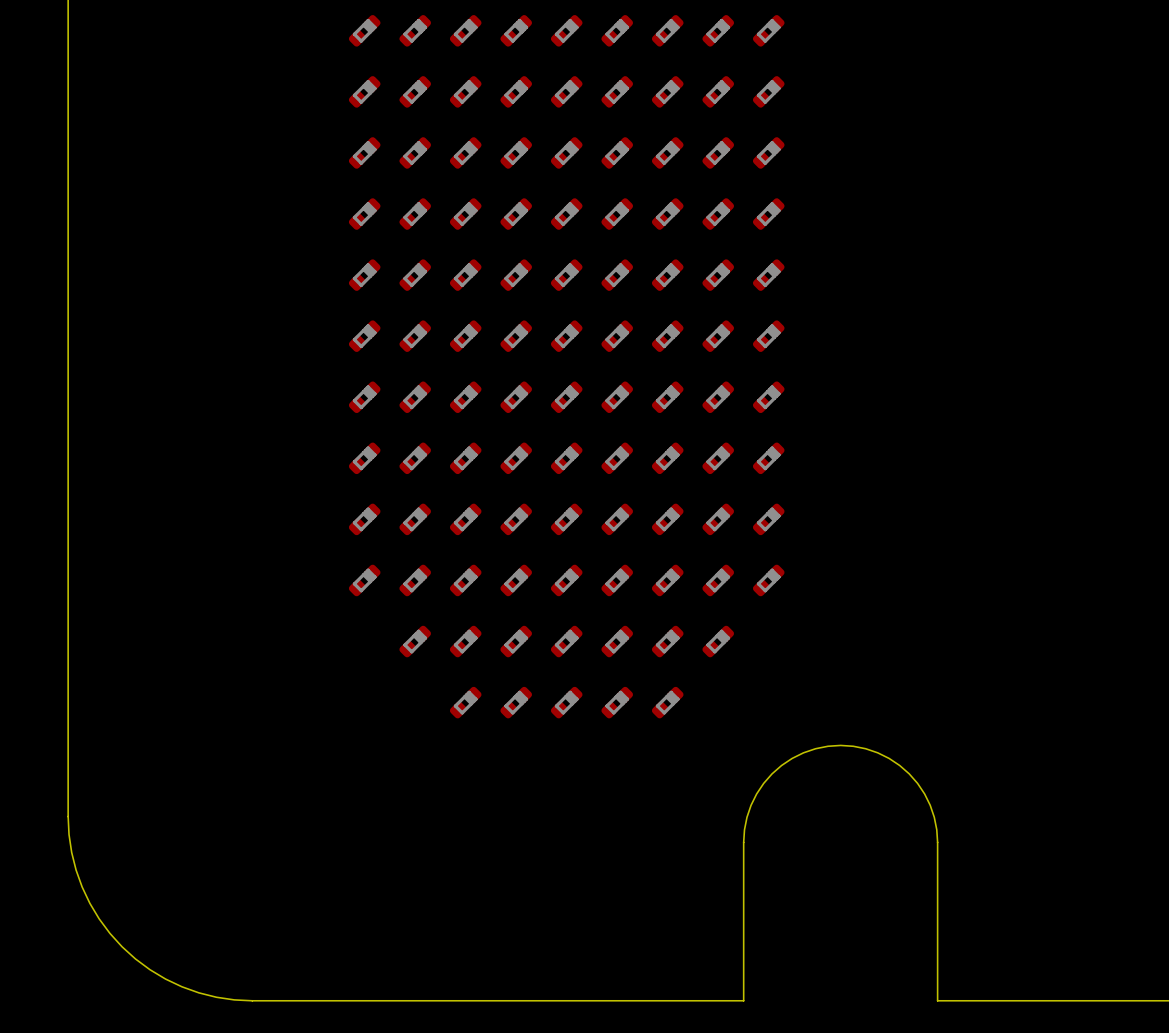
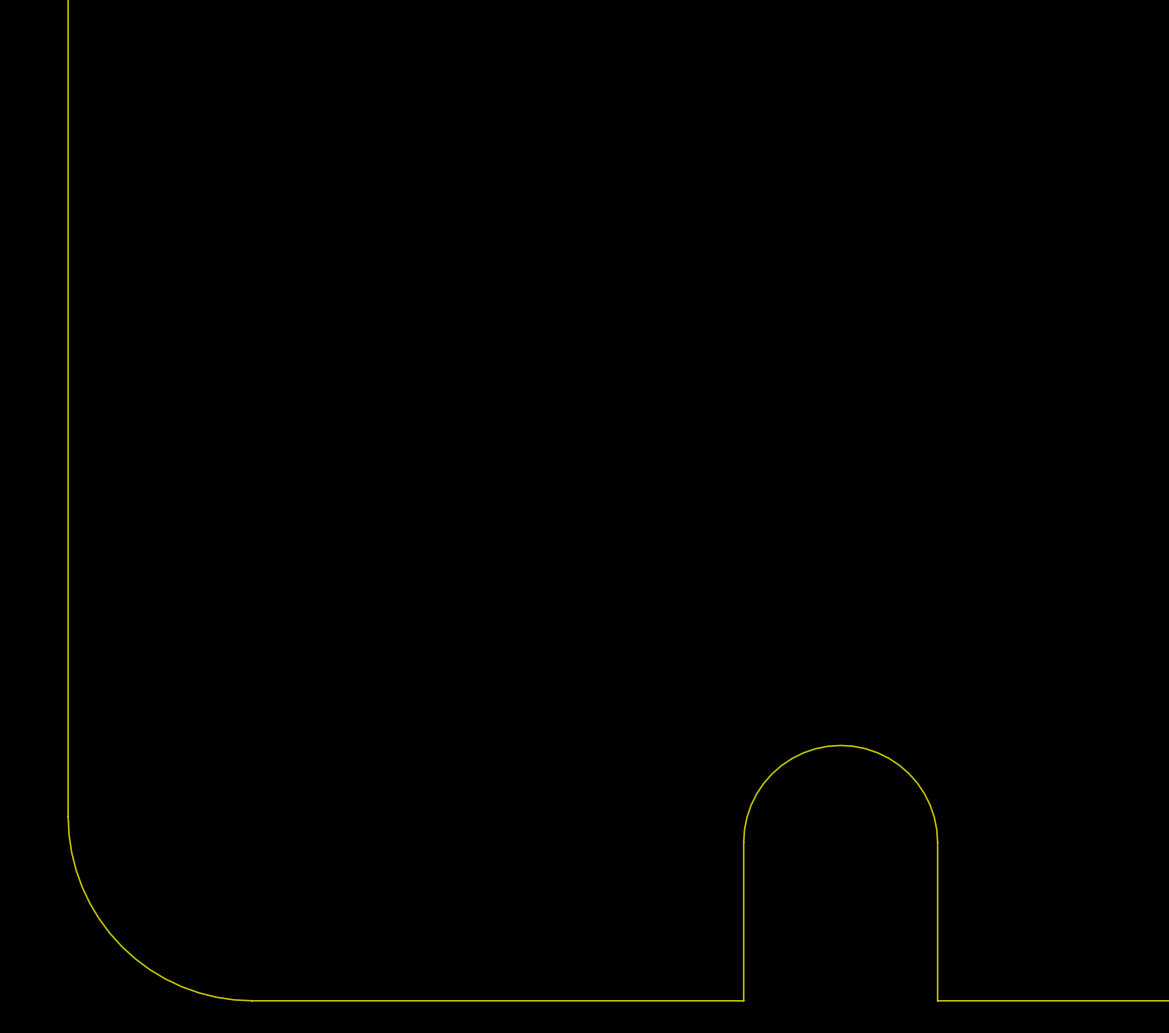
part: (364, 30) -> none
part: (415, 30) -> none
part: (465, 30) -> none
part: (516, 30) -> none
part: (566, 30) -> none
part: (617, 30) -> none
part: (667, 30) -> none
part: (718, 30) -> none
part: (768, 30) -> none
part: (364, 91) -> none
part: (415, 91) -> none
part: (465, 91) -> none
part: (516, 91) -> none
part: (566, 91) -> none
part: (617, 91) -> none
part: (667, 91) -> none
part: (718, 91) -> none
part: (768, 91) -> none
part: (364, 152) -> none
part: (415, 152) -> none
part: (465, 152) -> none
part: (516, 152) -> none
part: (566, 152) -> none
part: (617, 152) -> none
part: (667, 152) -> none
part: (718, 152) -> none
part: (768, 152) -> none
part: (364, 214) -> none
part: (415, 214) -> none
part: (465, 214) -> none
part: (516, 214) -> none
part: (566, 214) -> none
part: (617, 214) -> none
part: (667, 214) -> none
part: (718, 214) -> none
part: (768, 214) -> none
part: (364, 275) -> none
part: (415, 275) -> none
part: (465, 275) -> none
part: (516, 275) -> none
part: (566, 275) -> none
part: (617, 275) -> none
part: (667, 275) -> none
part: (718, 275) -> none
part: (768, 275) -> none
part: (364, 336) -> none
part: (415, 336) -> none
part: (465, 336) -> none
part: (516, 336) -> none
part: (566, 336) -> none
part: (617, 336) -> none
part: (667, 336) -> none
part: (718, 336) -> none
part: (768, 336) -> none
part: (364, 397) -> none
part: (415, 397) -> none
part: (465, 397) -> none
part: (516, 397) -> none
part: (566, 397) -> none
part: (617, 397) -> none
part: (667, 397) -> none
part: (718, 397) -> none
part: (768, 397) -> none
part: (364, 458) -> none
part: (415, 458) -> none
part: (465, 458) -> none
part: (516, 458) -> none
part: (566, 458) -> none
part: (617, 458) -> none
part: (667, 458) -> none
part: (718, 458) -> none
part: (768, 458) -> none
part: (364, 519) -> none
part: (415, 519) -> none
part: (465, 519) -> none
part: (516, 519) -> none
part: (566, 519) -> none
part: (617, 519) -> none
part: (667, 519) -> none
part: (718, 519) -> none
part: (768, 519) -> none
part: (364, 580) -> none
part: (415, 580) -> none
part: (465, 580) -> none
part: (516, 580) -> none
part: (566, 580) -> none
part: (617, 580) -> none
part: (667, 580) -> none
part: (718, 580) -> none
part: (768, 580) -> none
part: (415, 641) -> none
part: (465, 641) -> none
part: (516, 641) -> none
part: (566, 641) -> none
part: (617, 641) -> none
part: (667, 641) -> none
part: (718, 641) -> none
part: (465, 702) -> none
part: (516, 702) -> none
part: (566, 702) -> none
part: (617, 702) -> none
part: (667, 702) -> none

